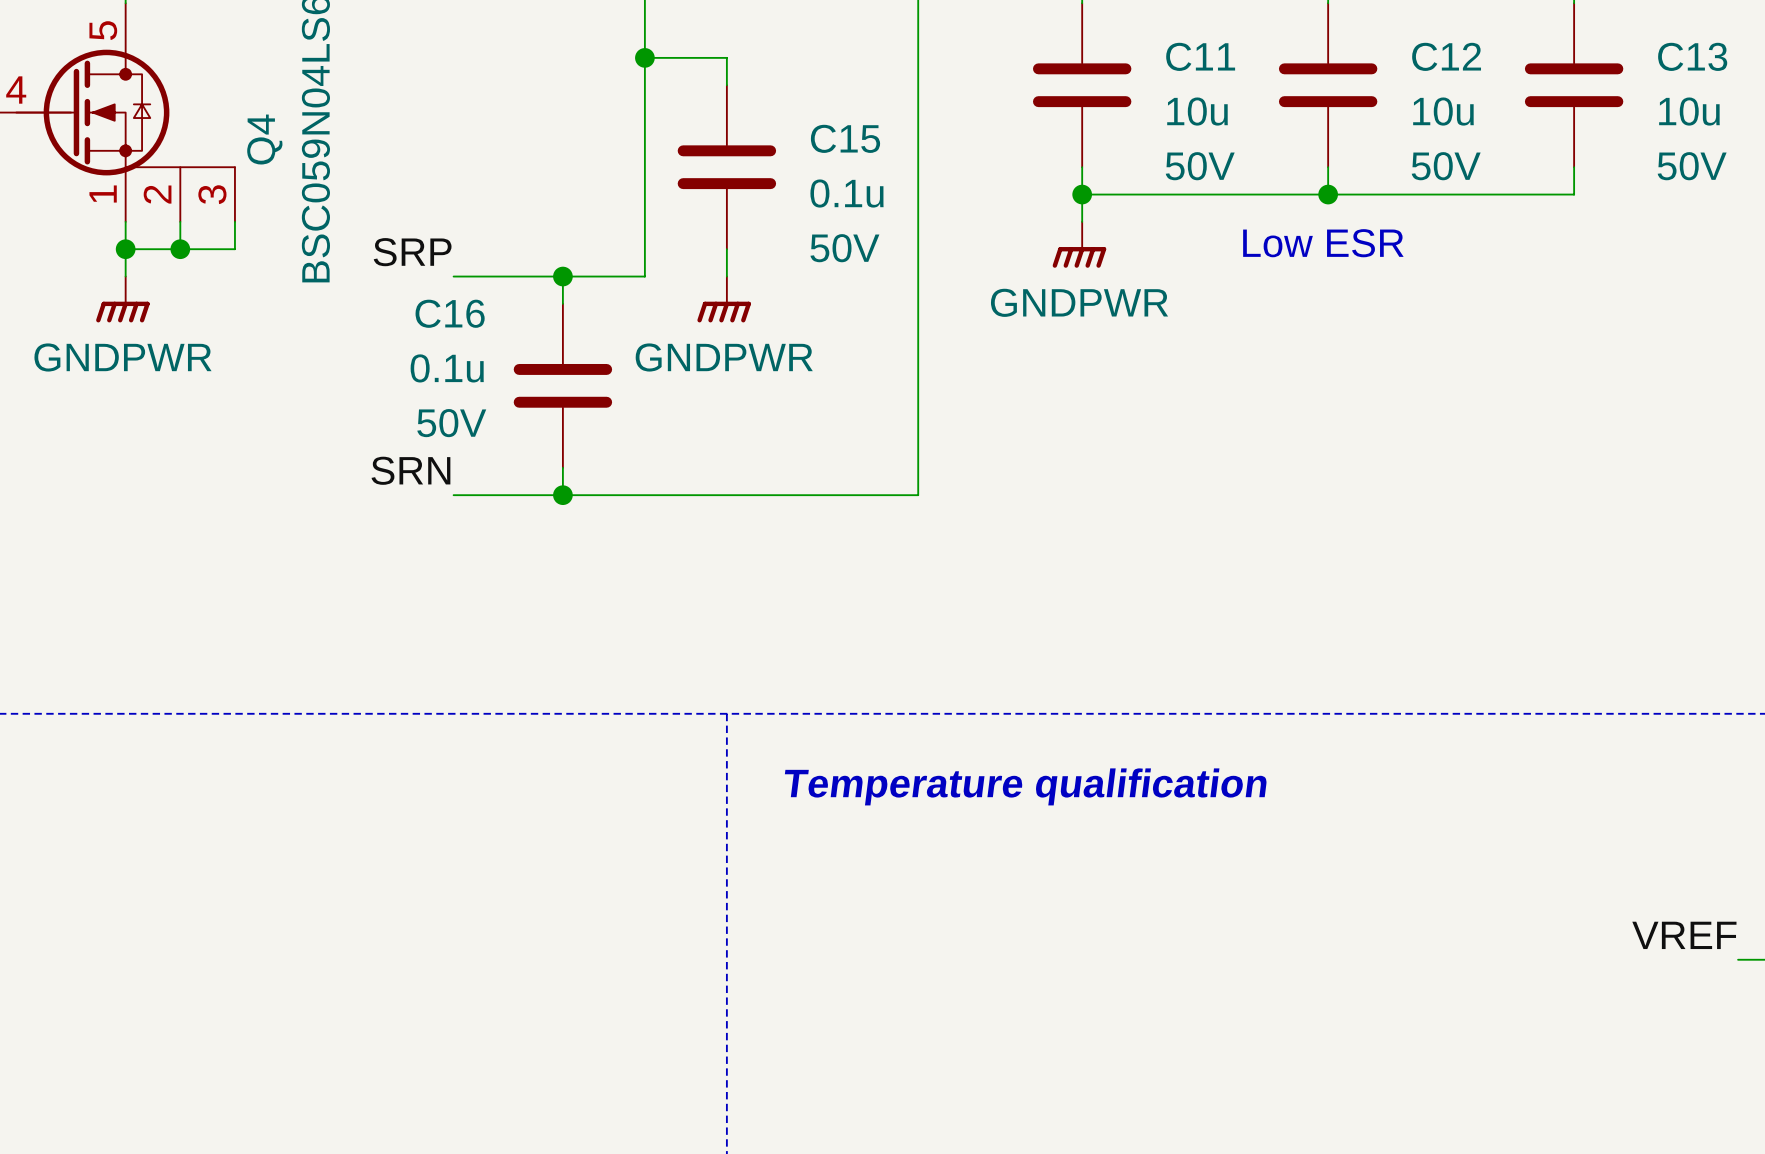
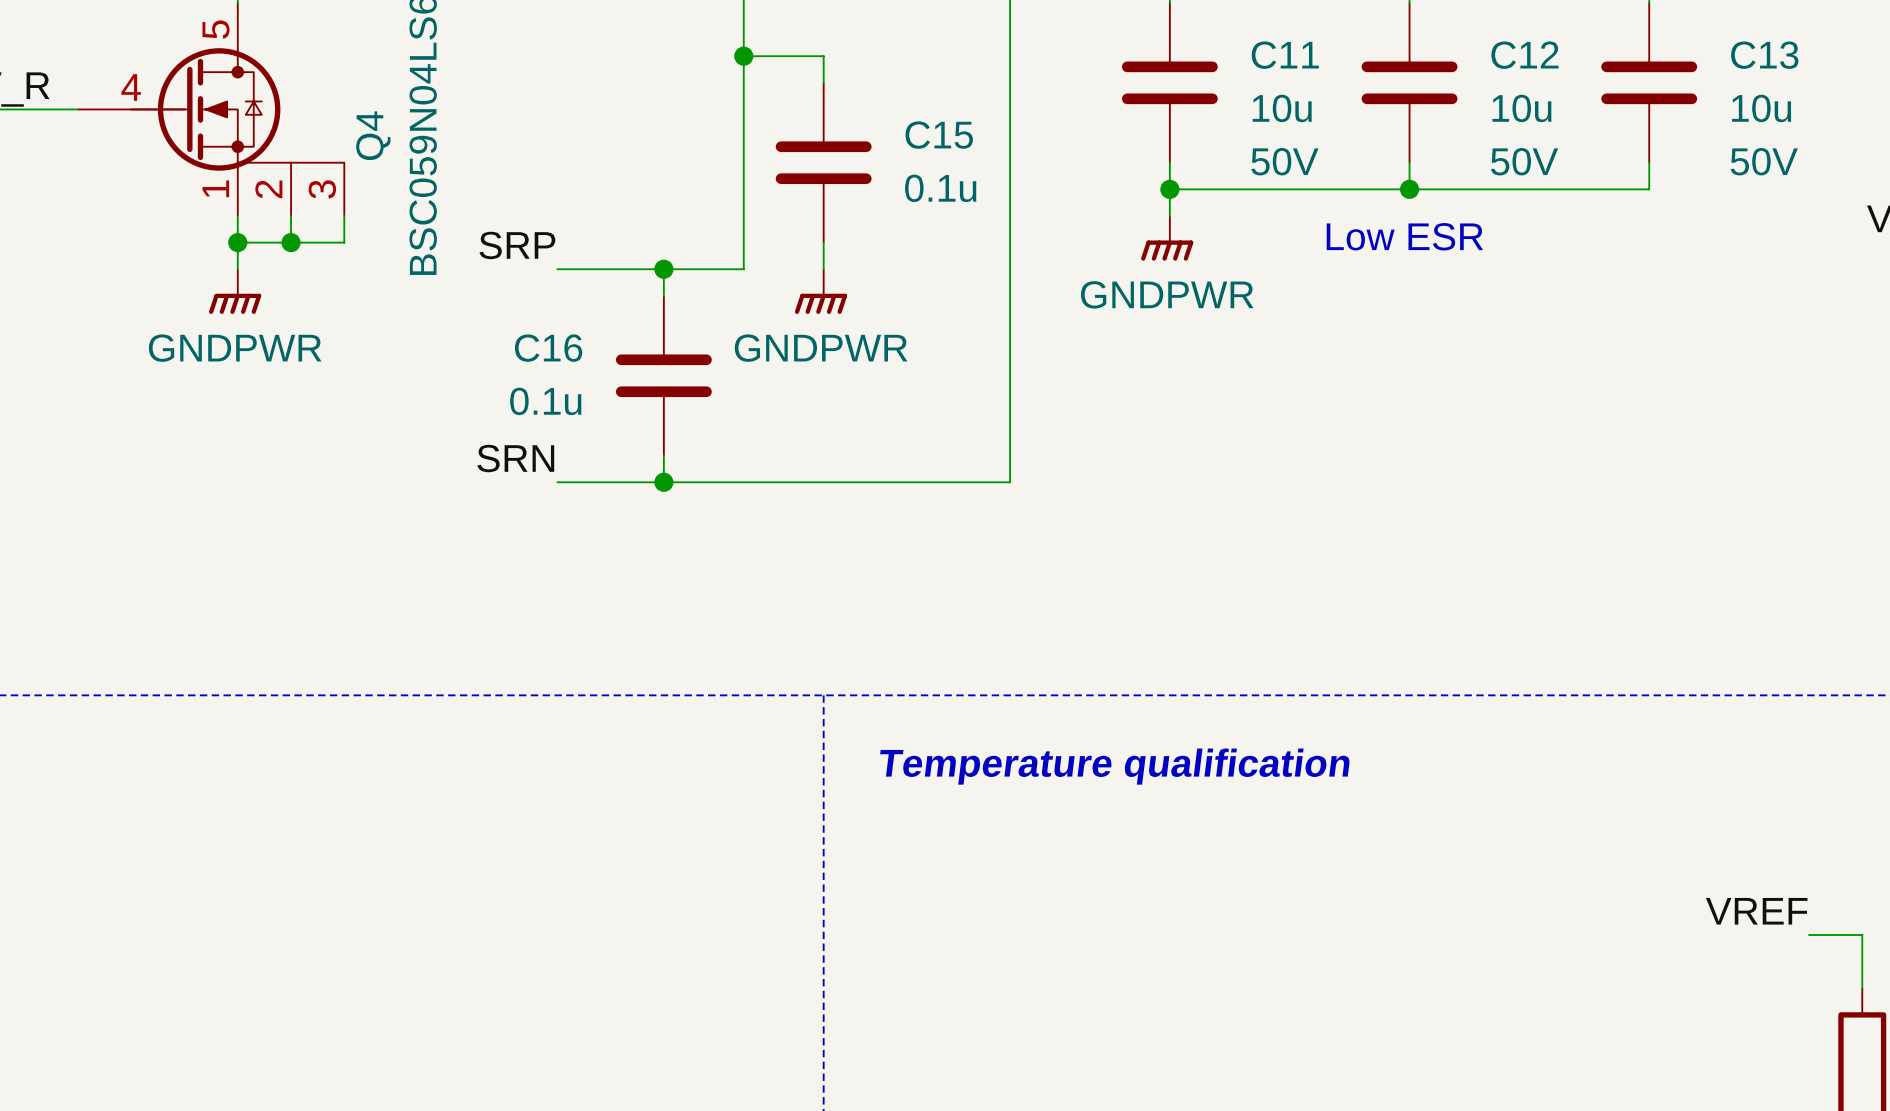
C15 text: 50V (844, 248) -> none
C16 name position: C16 (450, 313) -> C16 (548, 348)
C16 value position: 0.1u (447, 368) -> 0.1u (545, 401)
C16 text: 50V (451, 423) -> none

